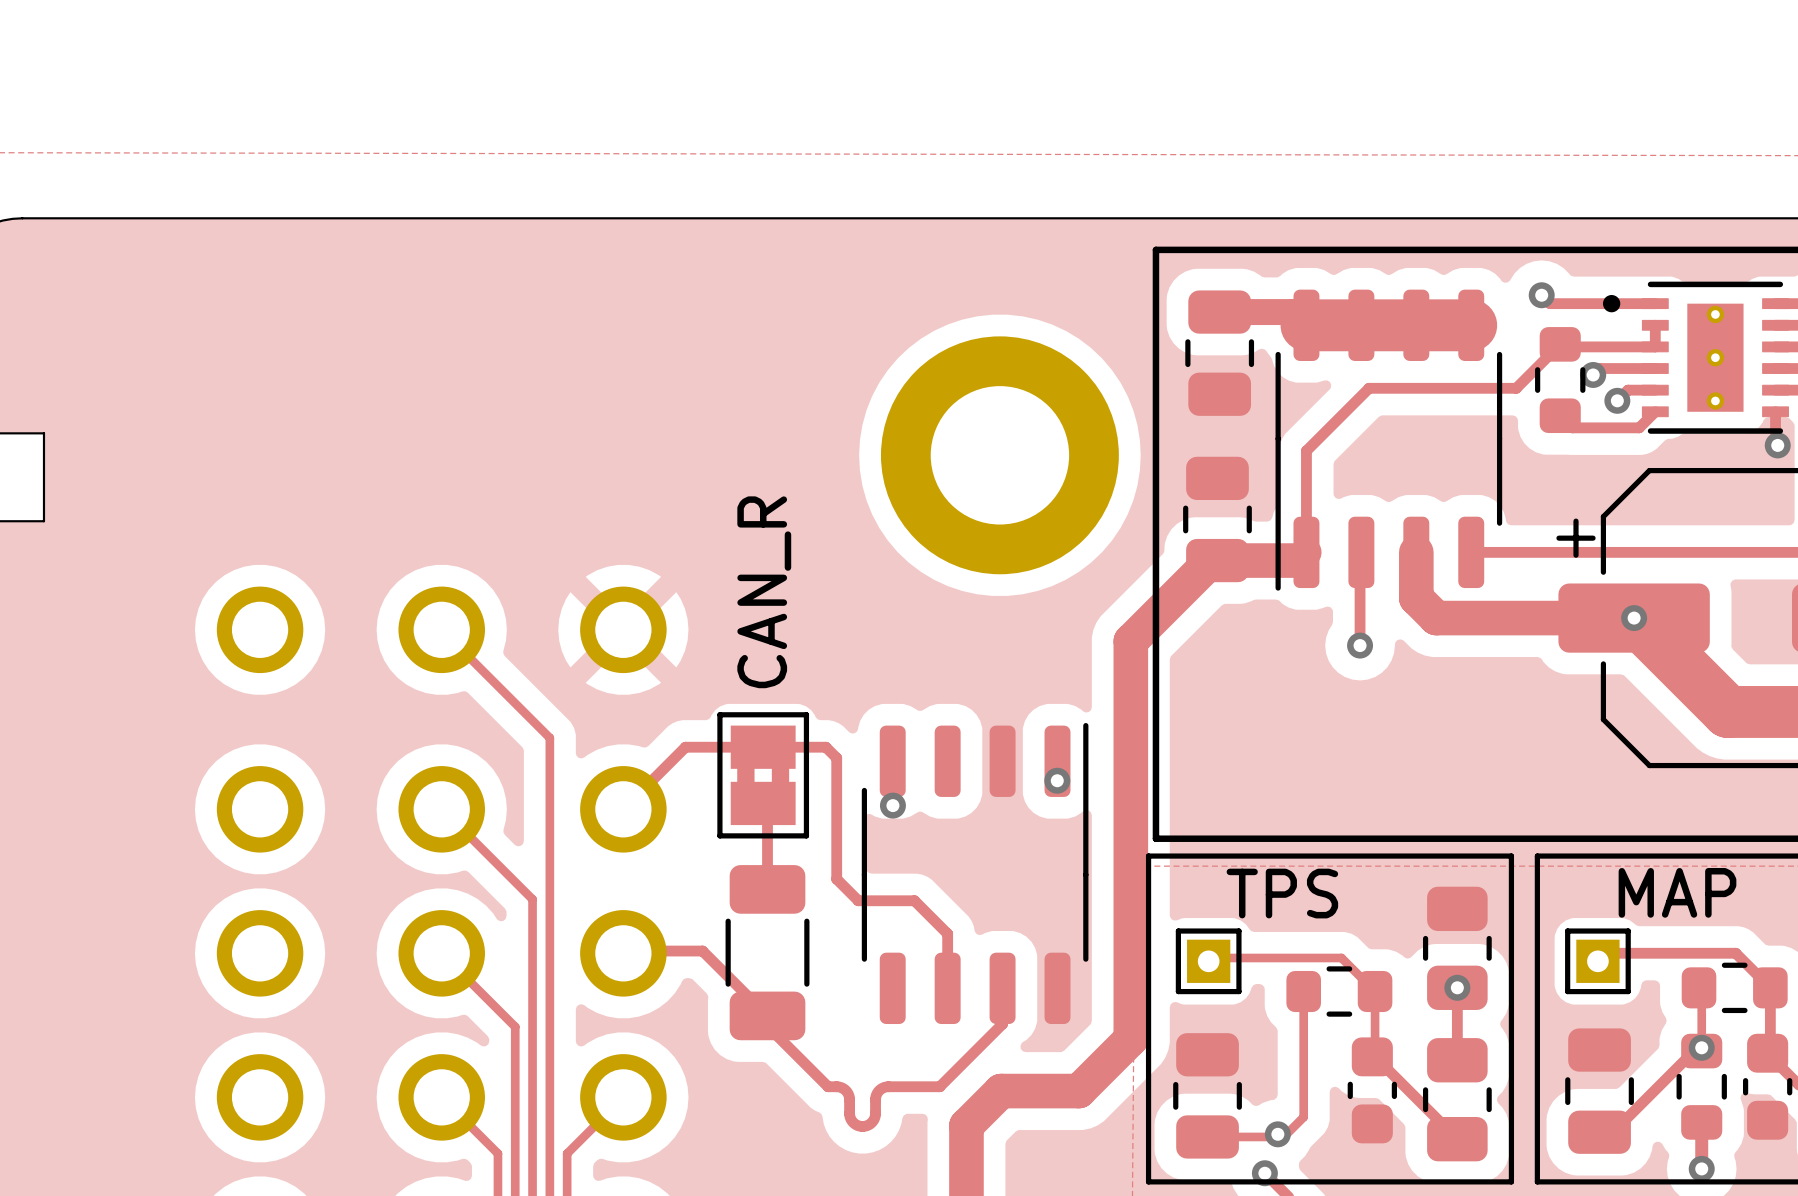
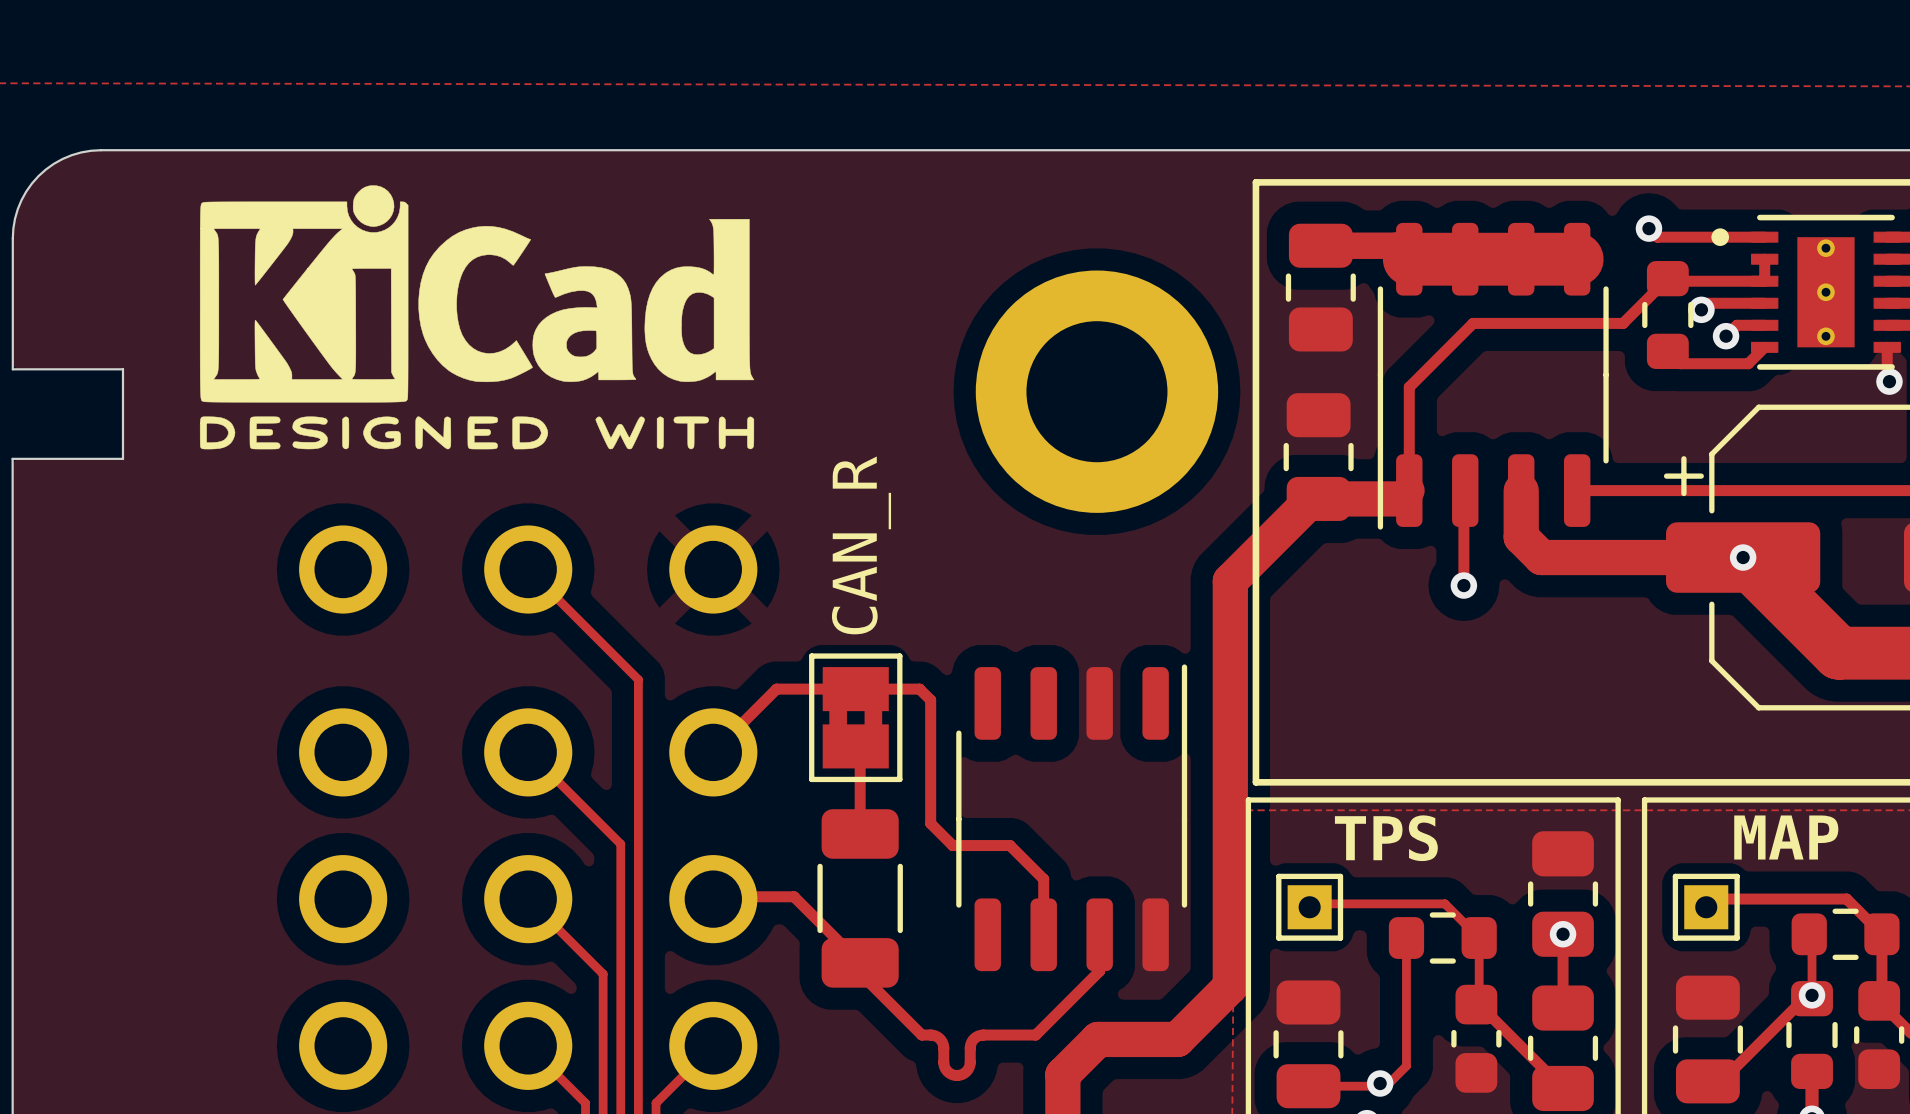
drawing: none -> [199, 185, 755, 450]
via: (1057, 780) -> none
via: (892, 805) -> none

